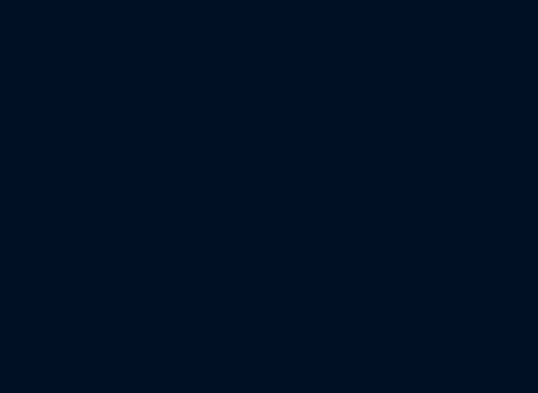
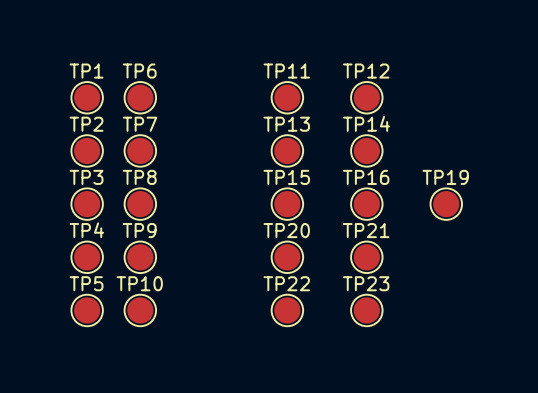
TP1: none -> (87, 97)
TP6: none -> (140, 97)
TP11: none -> (287, 97)
TP12: none -> (366, 97)
TP2: none -> (87, 150)
TP7: none -> (140, 150)
TP13: none -> (287, 150)
TP14: none -> (366, 150)
TP3: none -> (87, 204)
TP8: none -> (140, 204)
TP15: none -> (287, 204)
TP16: none -> (366, 204)
TP19: none -> (446, 204)
TP4: none -> (87, 257)
TP9: none -> (140, 257)
TP20: none -> (287, 257)
TP21: none -> (366, 257)
TP5: none -> (87, 310)
TP10: none -> (140, 310)
TP22: none -> (287, 310)
TP23: none -> (366, 310)

